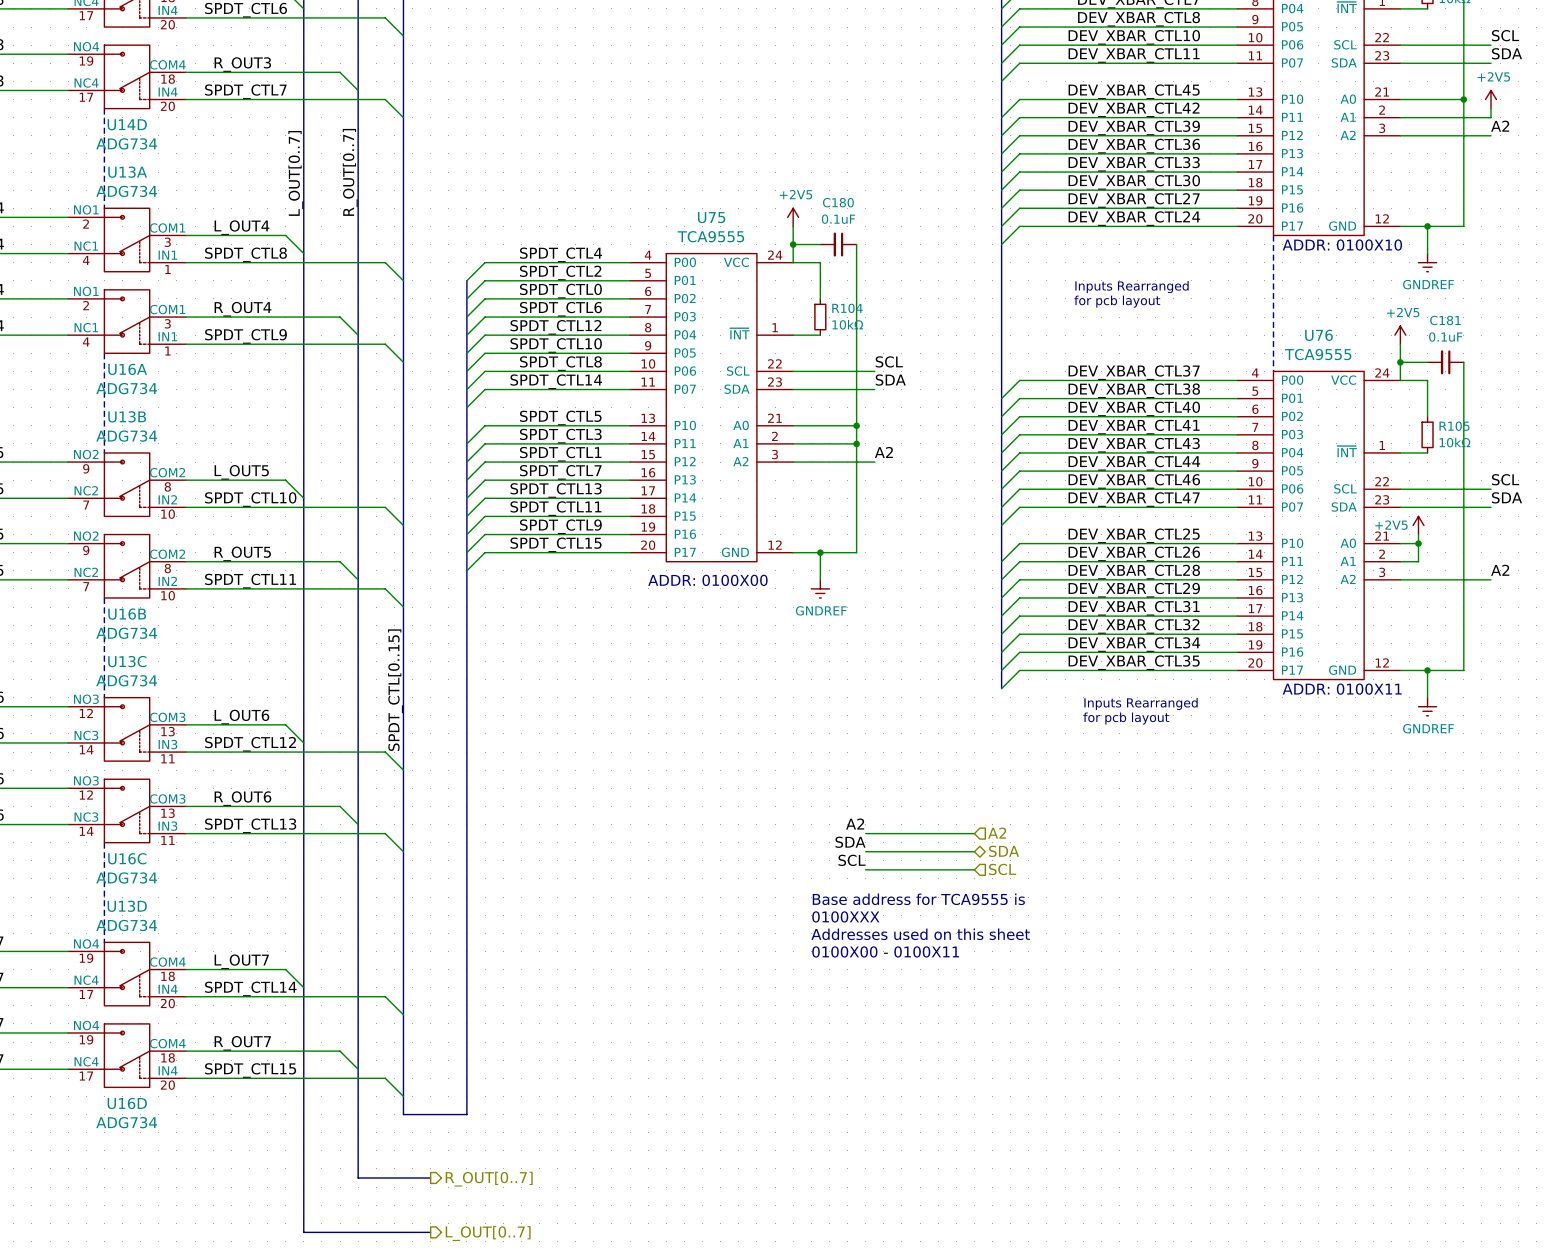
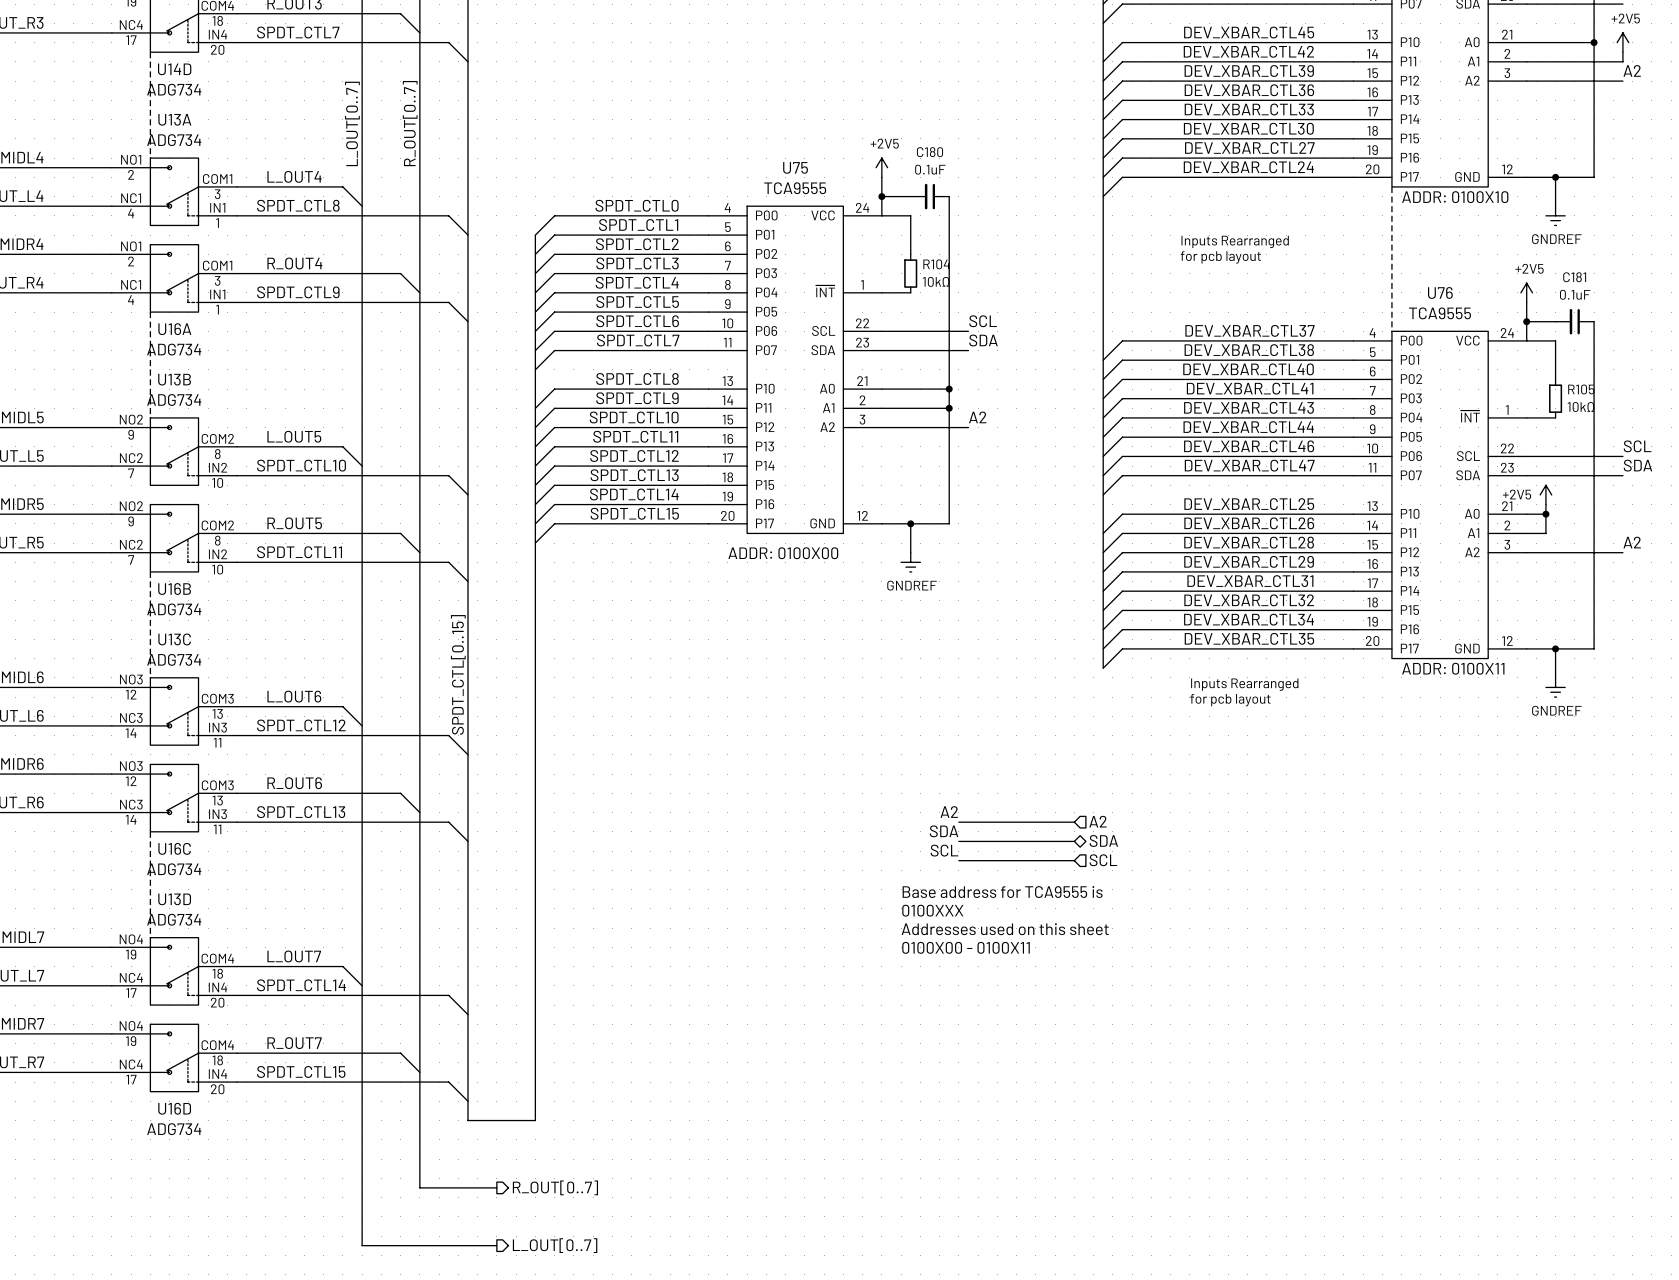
label: SPDT_CTL4 (560, 254) -> SPDT_CTL0 (637, 205)
label: SPDT_CTL2 (560, 272) -> SPDT_CTL1 (638, 225)
label: SPDT_CTL0 (560, 291) -> SPDT_CTL2 (637, 244)
label: SPDT_CTL6 (560, 309) -> SPDT_CTL3 (637, 263)
label: SPDT_CTL12 (555, 327) -> SPDT_CTL4 (637, 282)
label: SPDT_CTL10 (556, 345) -> SPDT_CTL5 (637, 302)
label: SPDT_CTL8 (560, 363) -> SPDT_CTL6 (637, 321)
label: SPDT_CTL14 (556, 381) -> SPDT_CTL7 (638, 340)
label: SPDT_CTL5 (560, 417) -> SPDT_CTL8 (637, 378)
label: SPDT_CTL3 (560, 436) -> SPDT_CTL9 (637, 398)
label: SPDT_CTL1 (560, 454) -> SPDT_CTL10 (634, 417)
label: SPDT_CTL7 (560, 472) -> SPDT_CTL11 (635, 436)
label: SPDT_CTL13 (556, 490) -> SPDT_CTL12 (634, 456)
label: SPDT_CTL11 (555, 508) -> SPDT_CTL13 (634, 475)
label: SPDT_CTL9 (560, 526) -> SPDT_CTL14 (634, 494)

